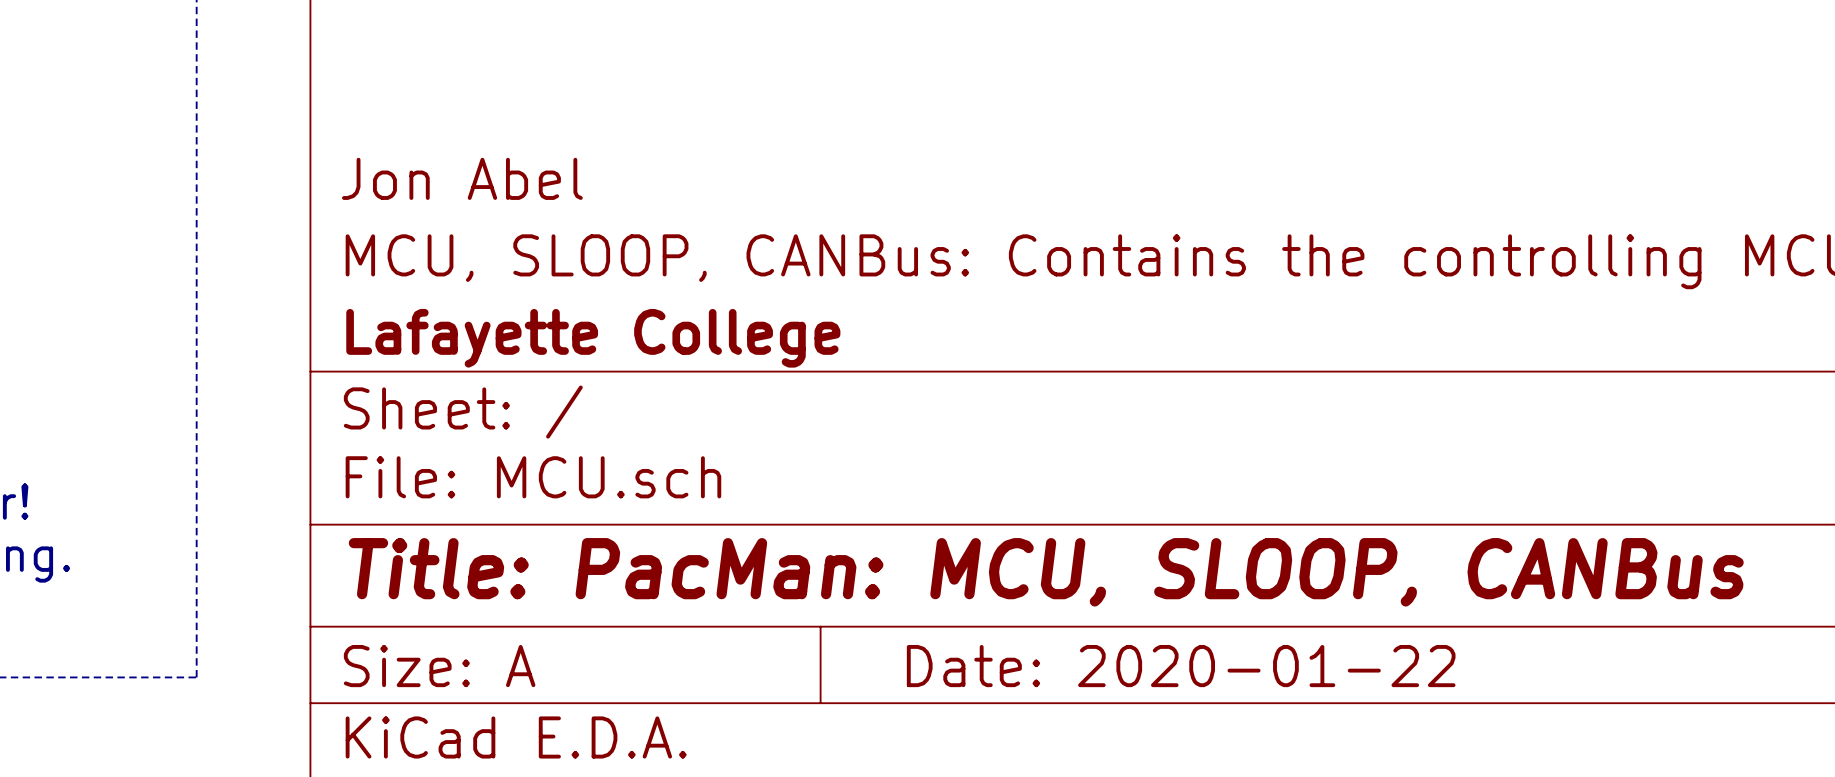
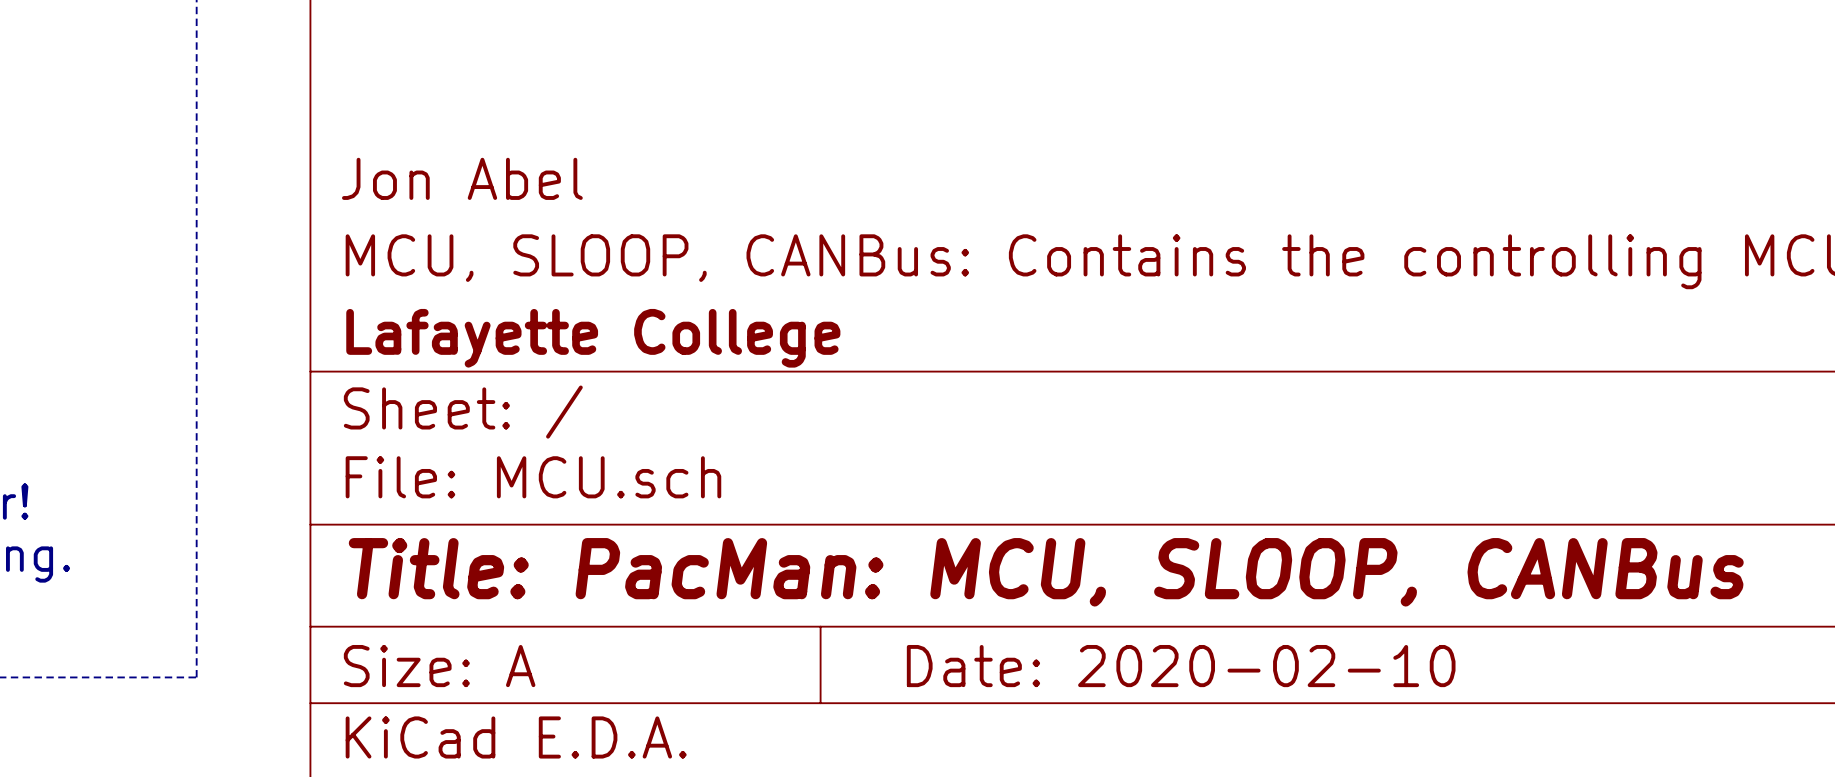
title block: Date: 2020-01-22 (1181, 666) -> Date: 2020-02-10 (1181, 666)

